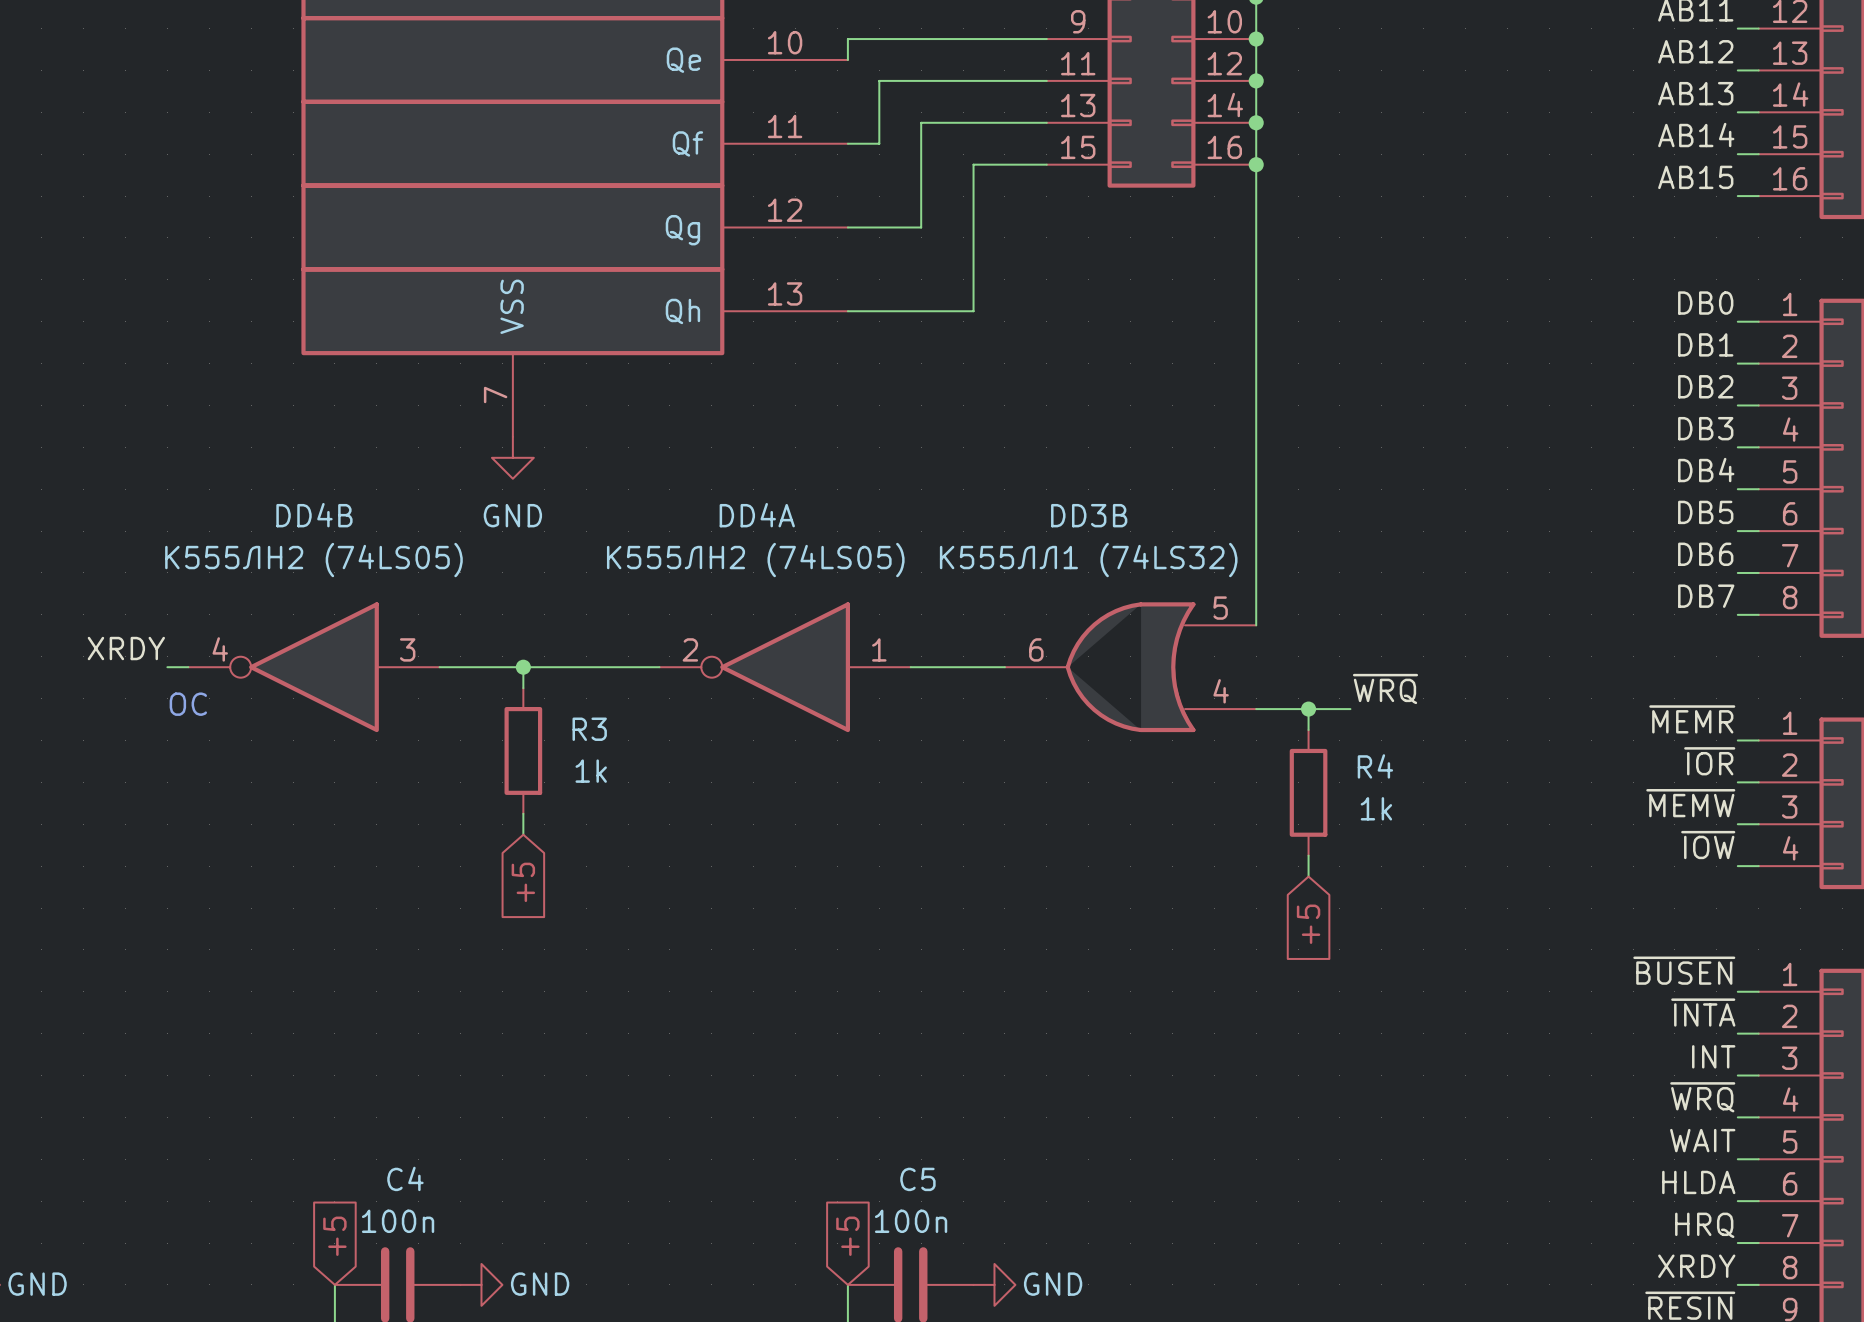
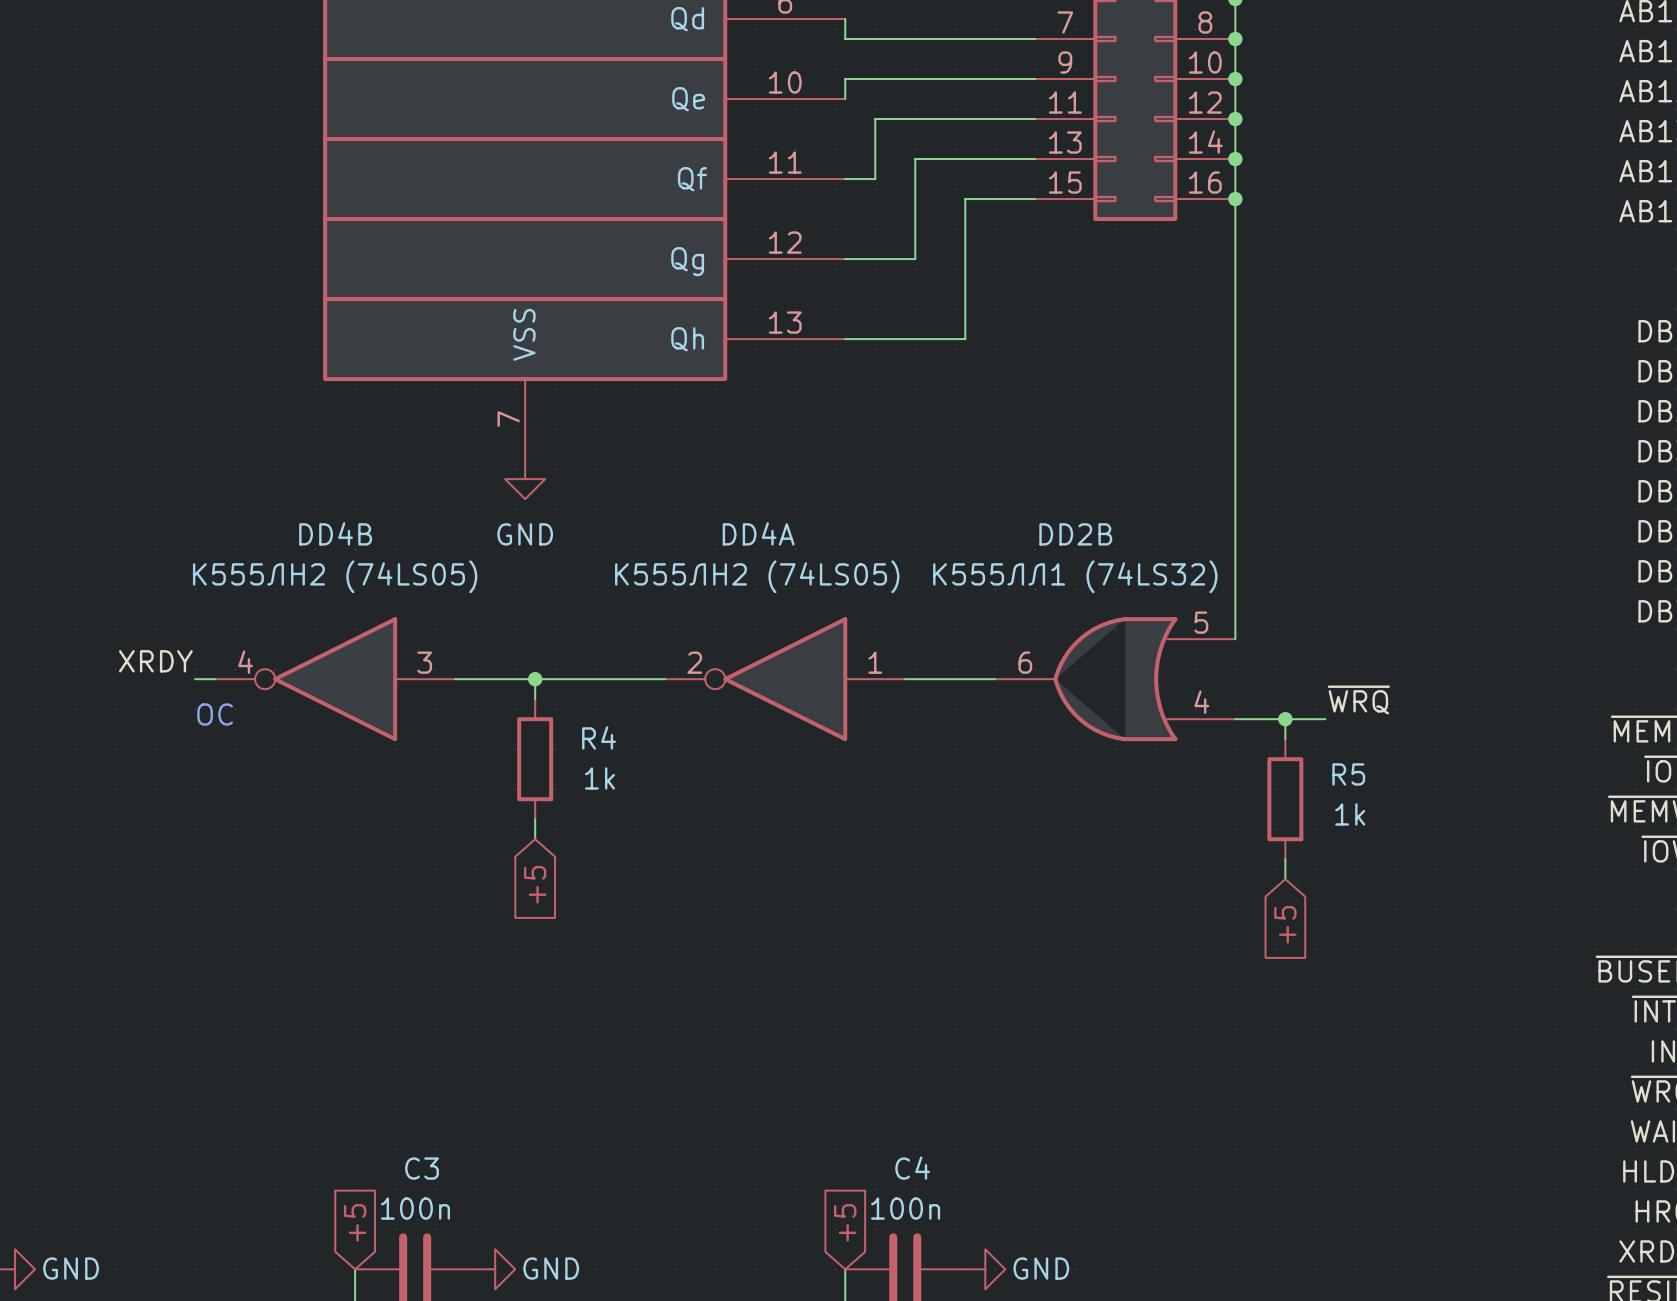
DD3B name: DD3B (1089, 515) -> DD2B (1075, 534)
R3 name: R3 (589, 729) -> R4 (599, 737)
R4 name: R4 (1375, 766) -> R5 (1348, 774)
C4 name: C4 (405, 1178) -> C3 (422, 1168)
C5 name: C5 (917, 1179) -> C4 (912, 1168)

